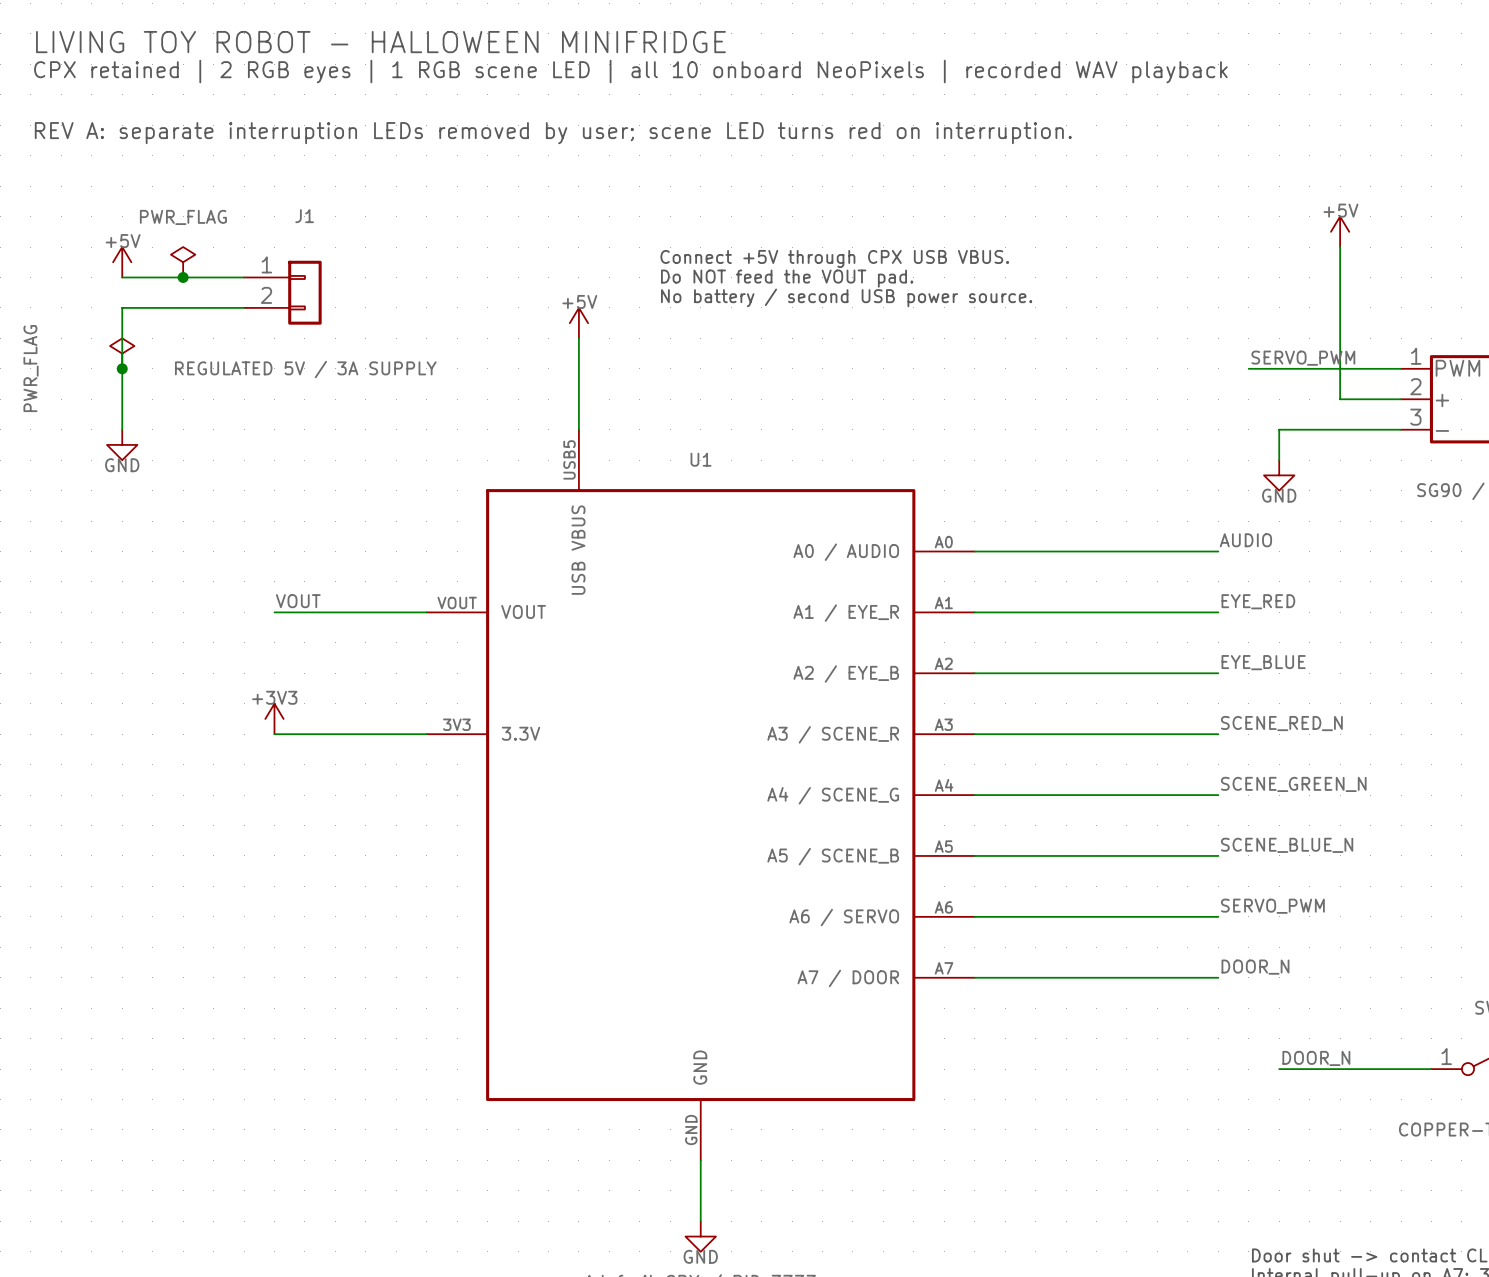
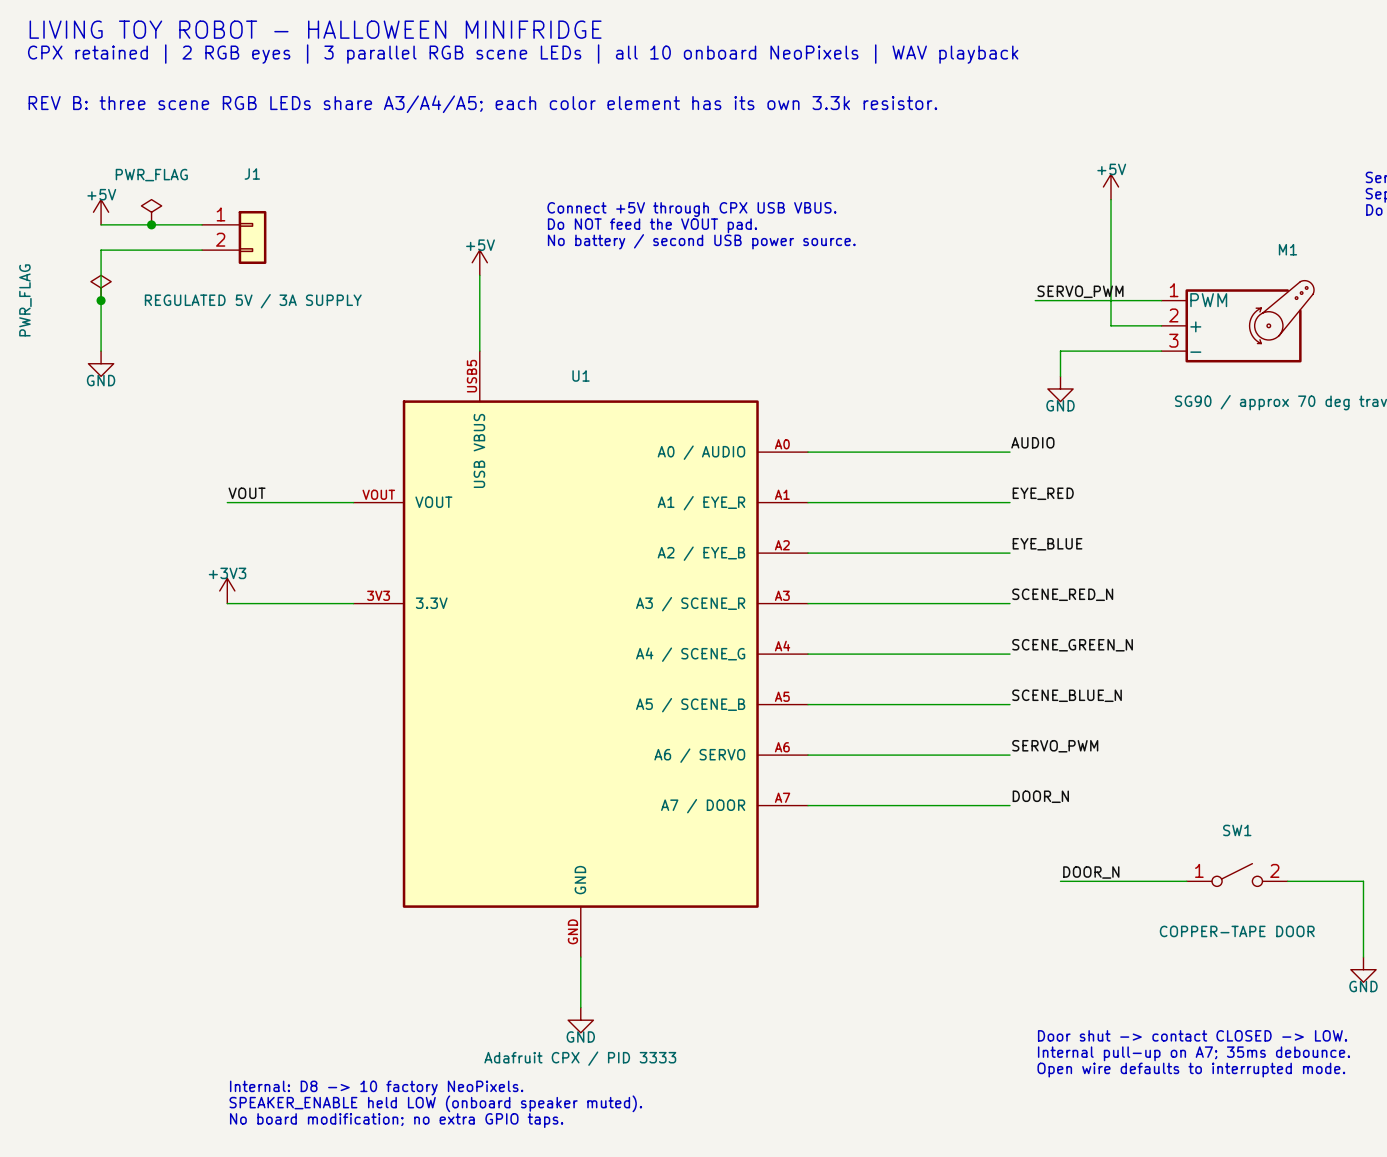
text: CPX retained | 2 RGB eyes | 1 RGB scene LED | all 10 onboard NeoPixels | recorded WAV playback (630, 71) -> CPX retained | 2 RGB eyes | 3 parallel RGB scene LEDs | all 10 onboard NeoPixels | WAV playback (523, 54)
text: REV A: separate interruption LEDs removed by user; scene LED turns red on interruption. (553, 133) -> REV B: three scene RGB LEDs share A3/A4/A5; each color element has its own 3.3k resistor. (482, 104)

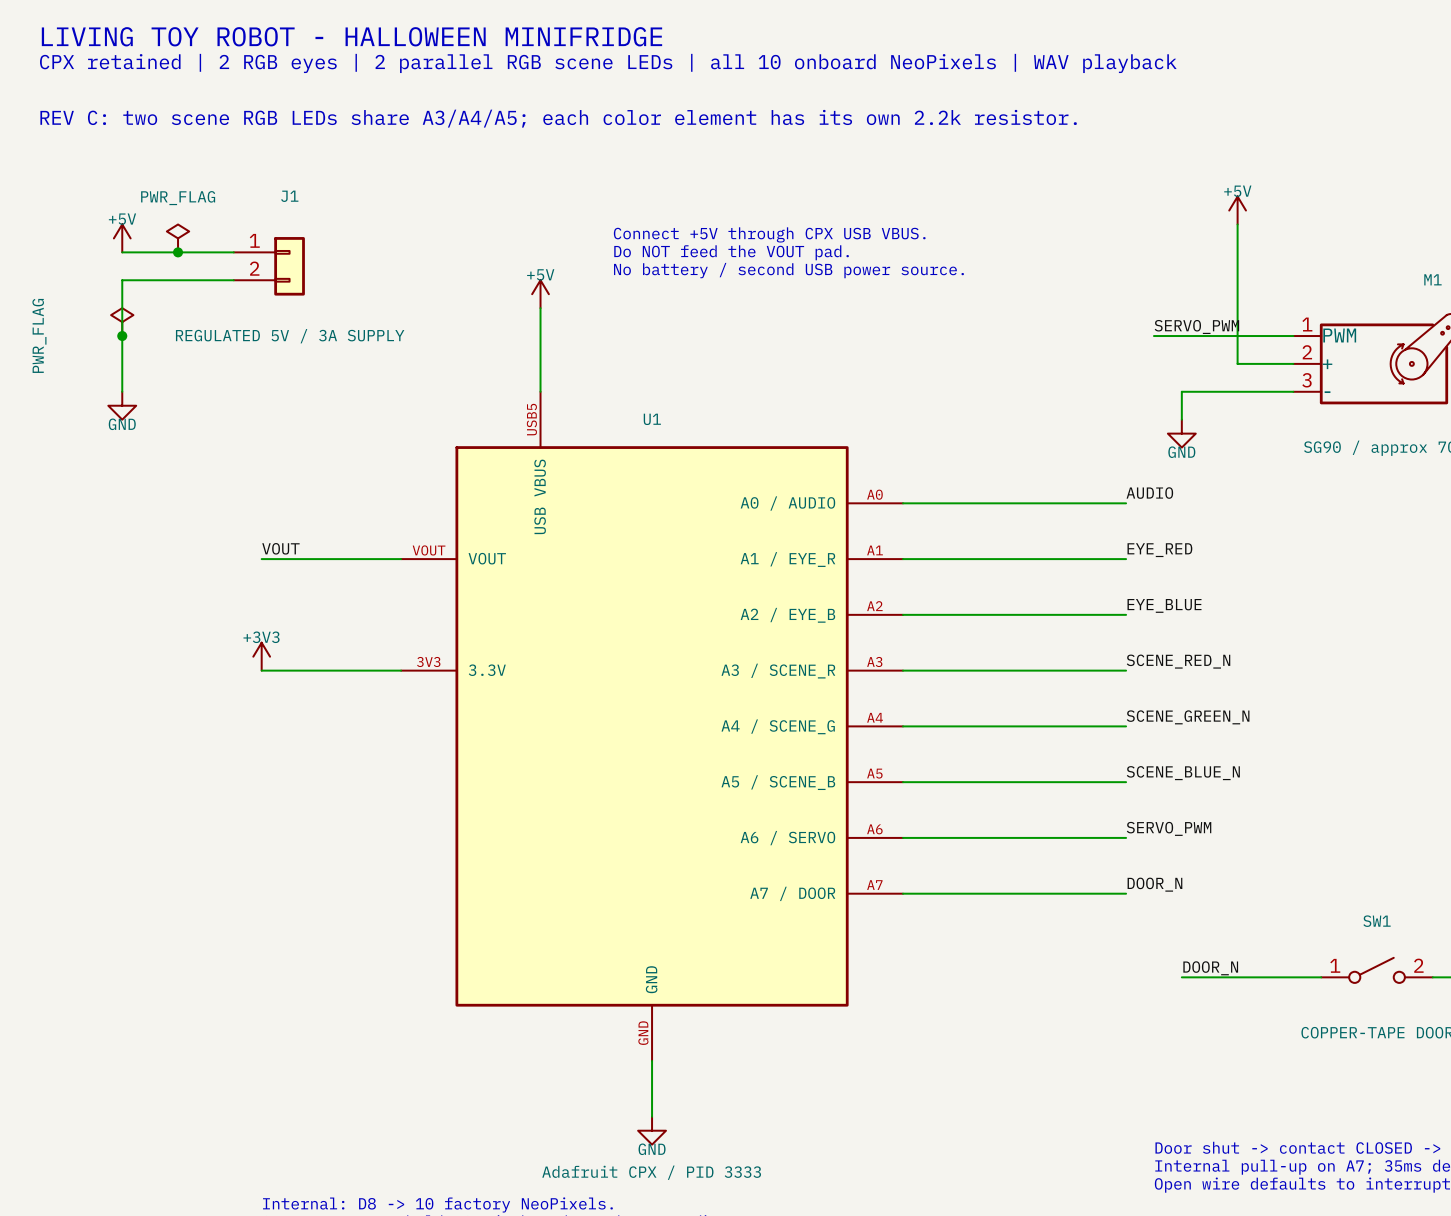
text: CPX retained | 2 RGB eyes | 3 parallel RGB scene LEDs | all 10 onboard NeoPixels | WAV playback (523, 54) -> CPX retained | 2 RGB eyes | 2 parallel RGB scene LEDs | all 10 onboard NeoPixels | WAV playback (608, 63)
text: REV B: three scene RGB LEDs share A3/A4/A5; each color element has its own 3.3k resistor. (482, 104) -> REV C: two scene RGB LEDs share A3/A4/A5; each color element has its own 2.2k resistor. (558, 118)

